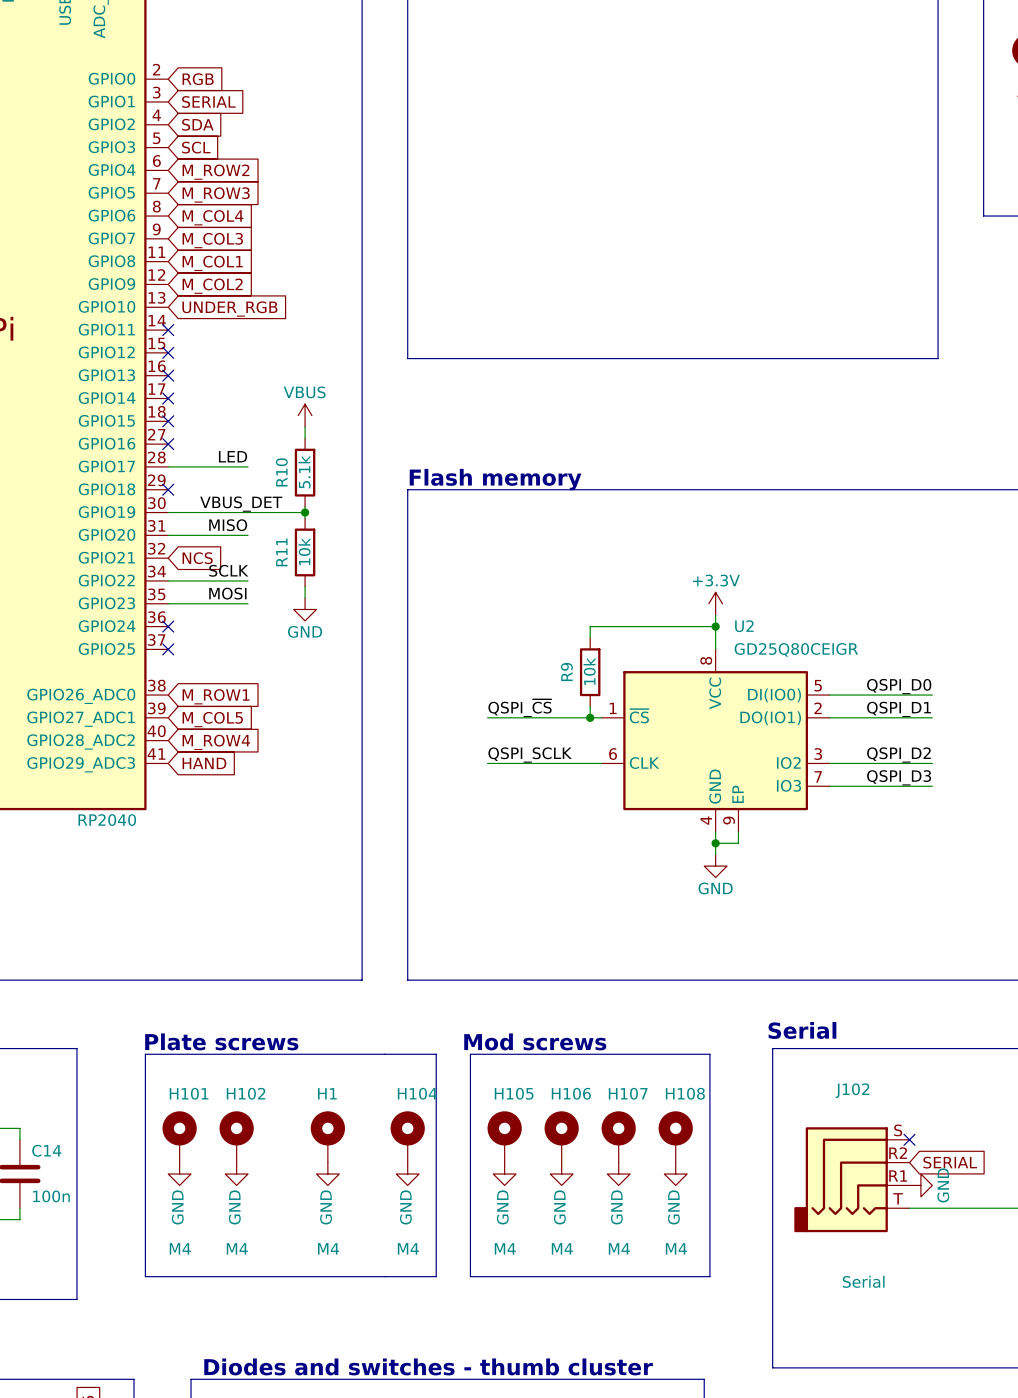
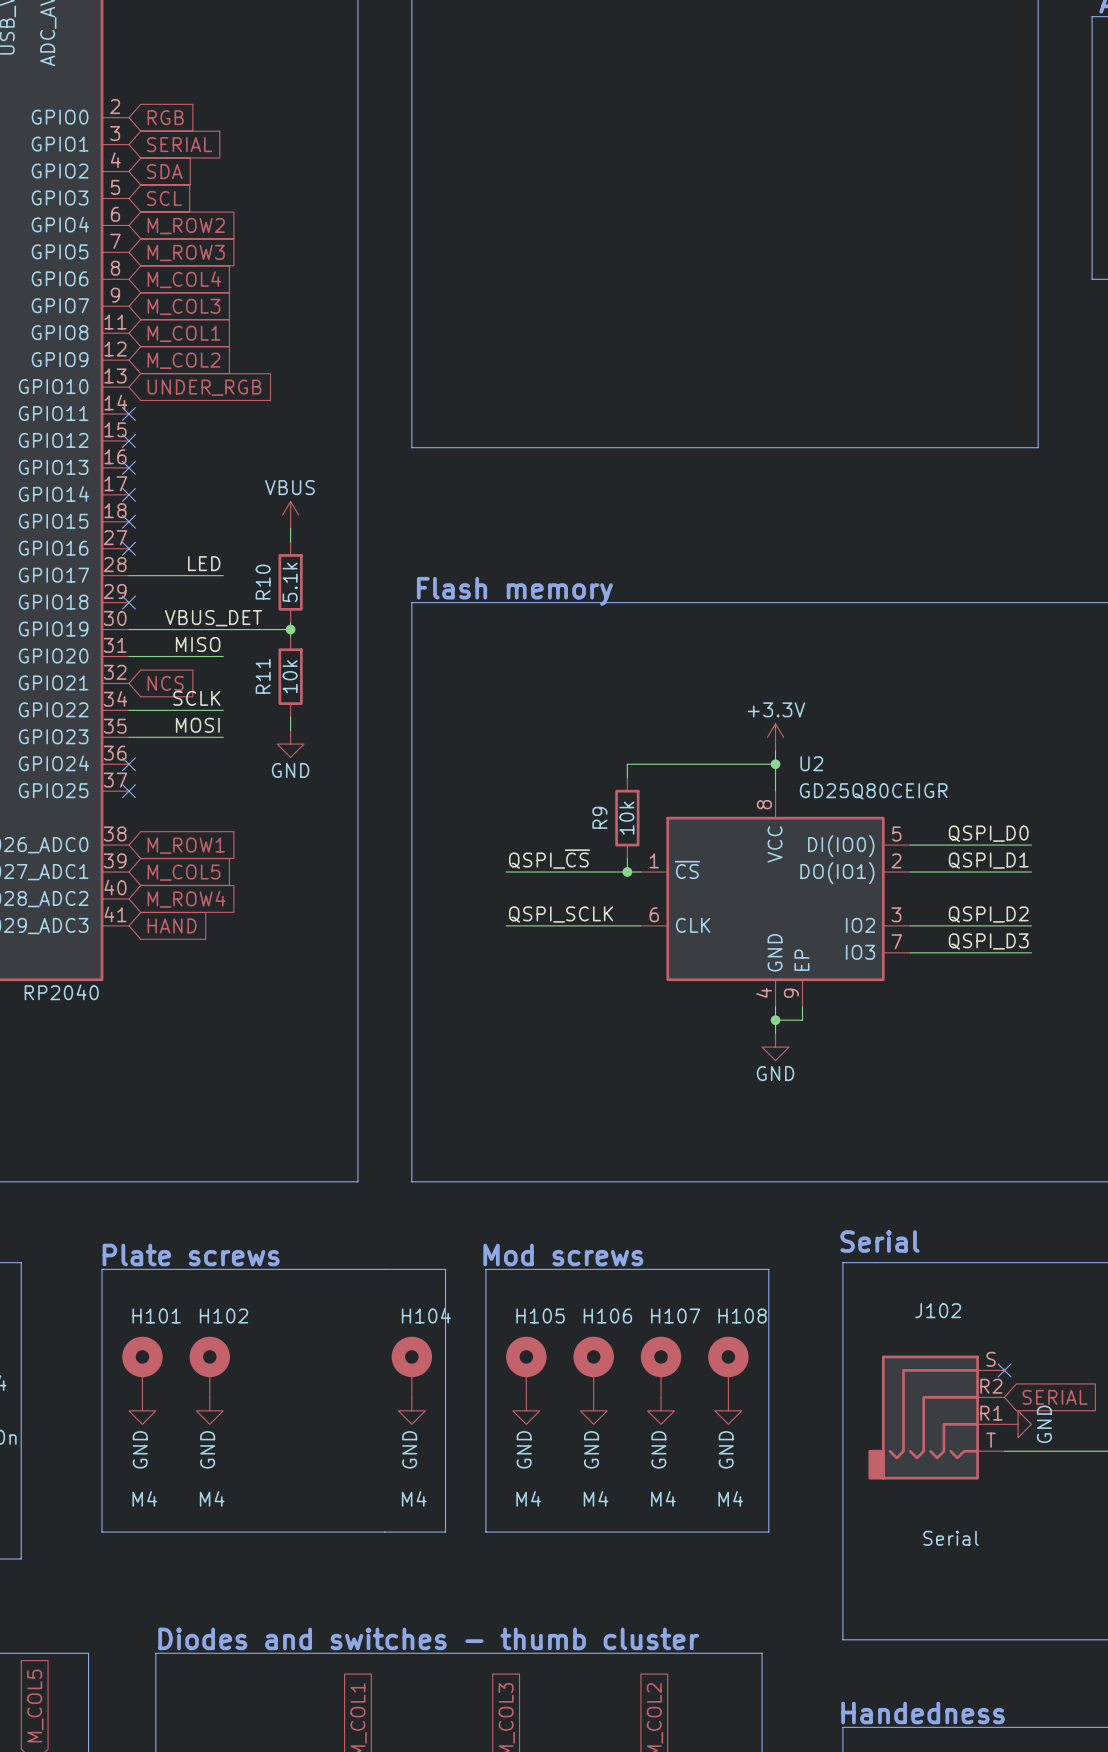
H1: M4 (327, 1136) -> none
power symbol: GND (327, 1174) -> none

